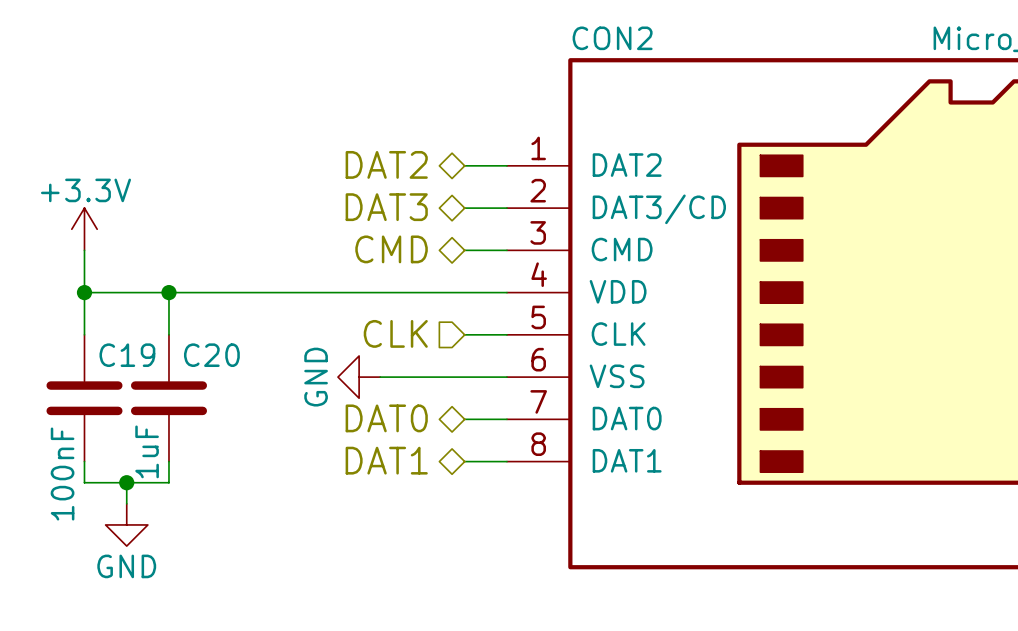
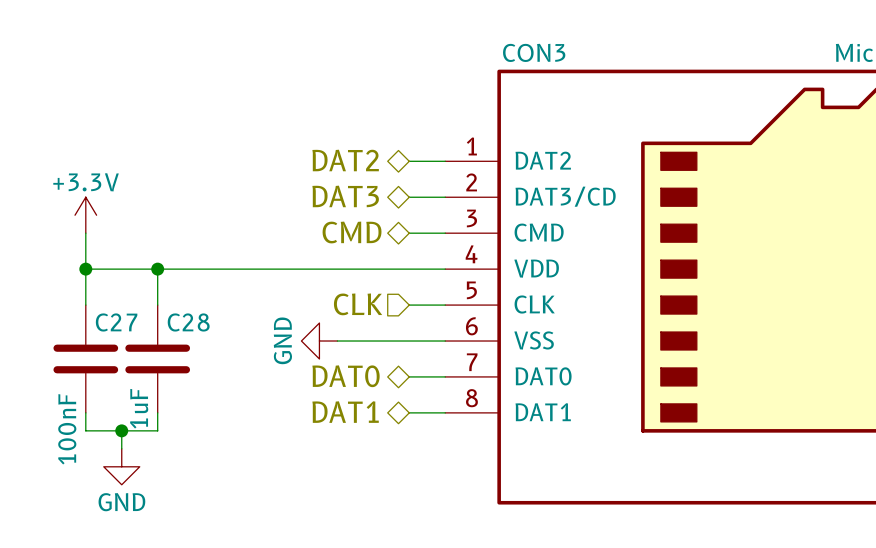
CON2 name: CON2 (612, 38) -> CON3 (534, 52)
C19 name: C19 (127, 355) -> C27 (116, 322)
C20 name: C20 (211, 355) -> C28 (188, 322)

